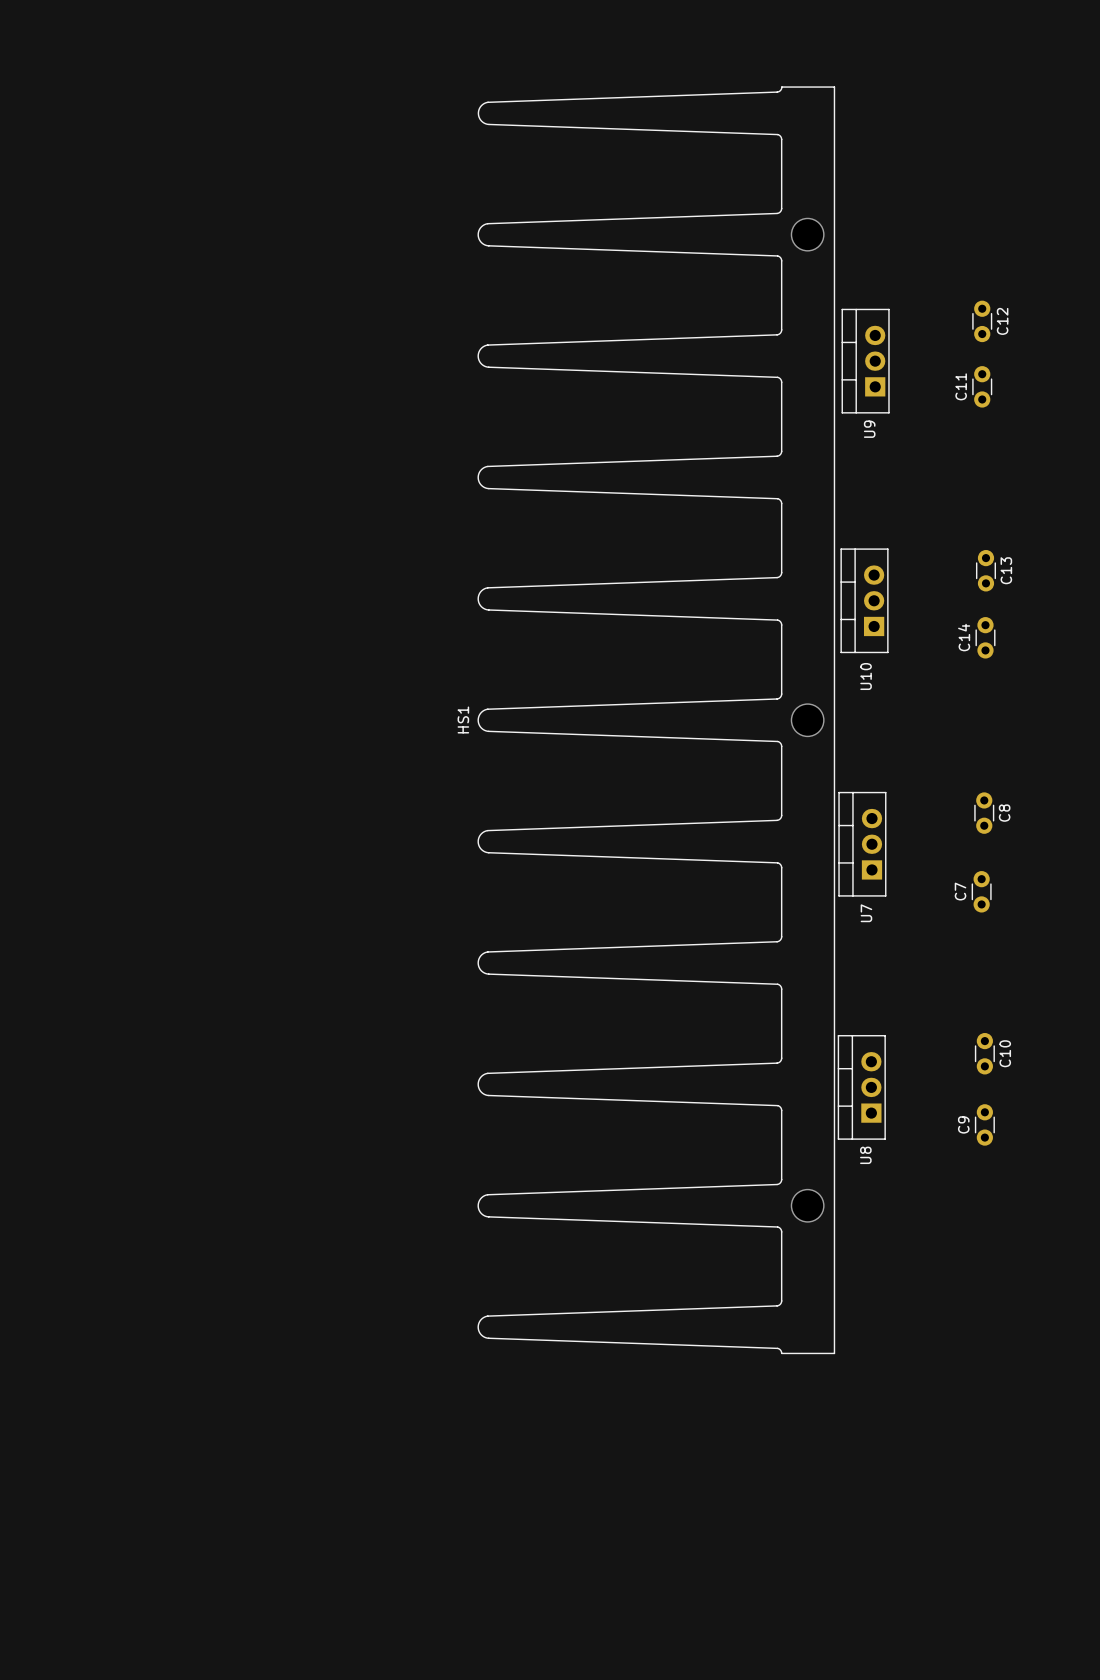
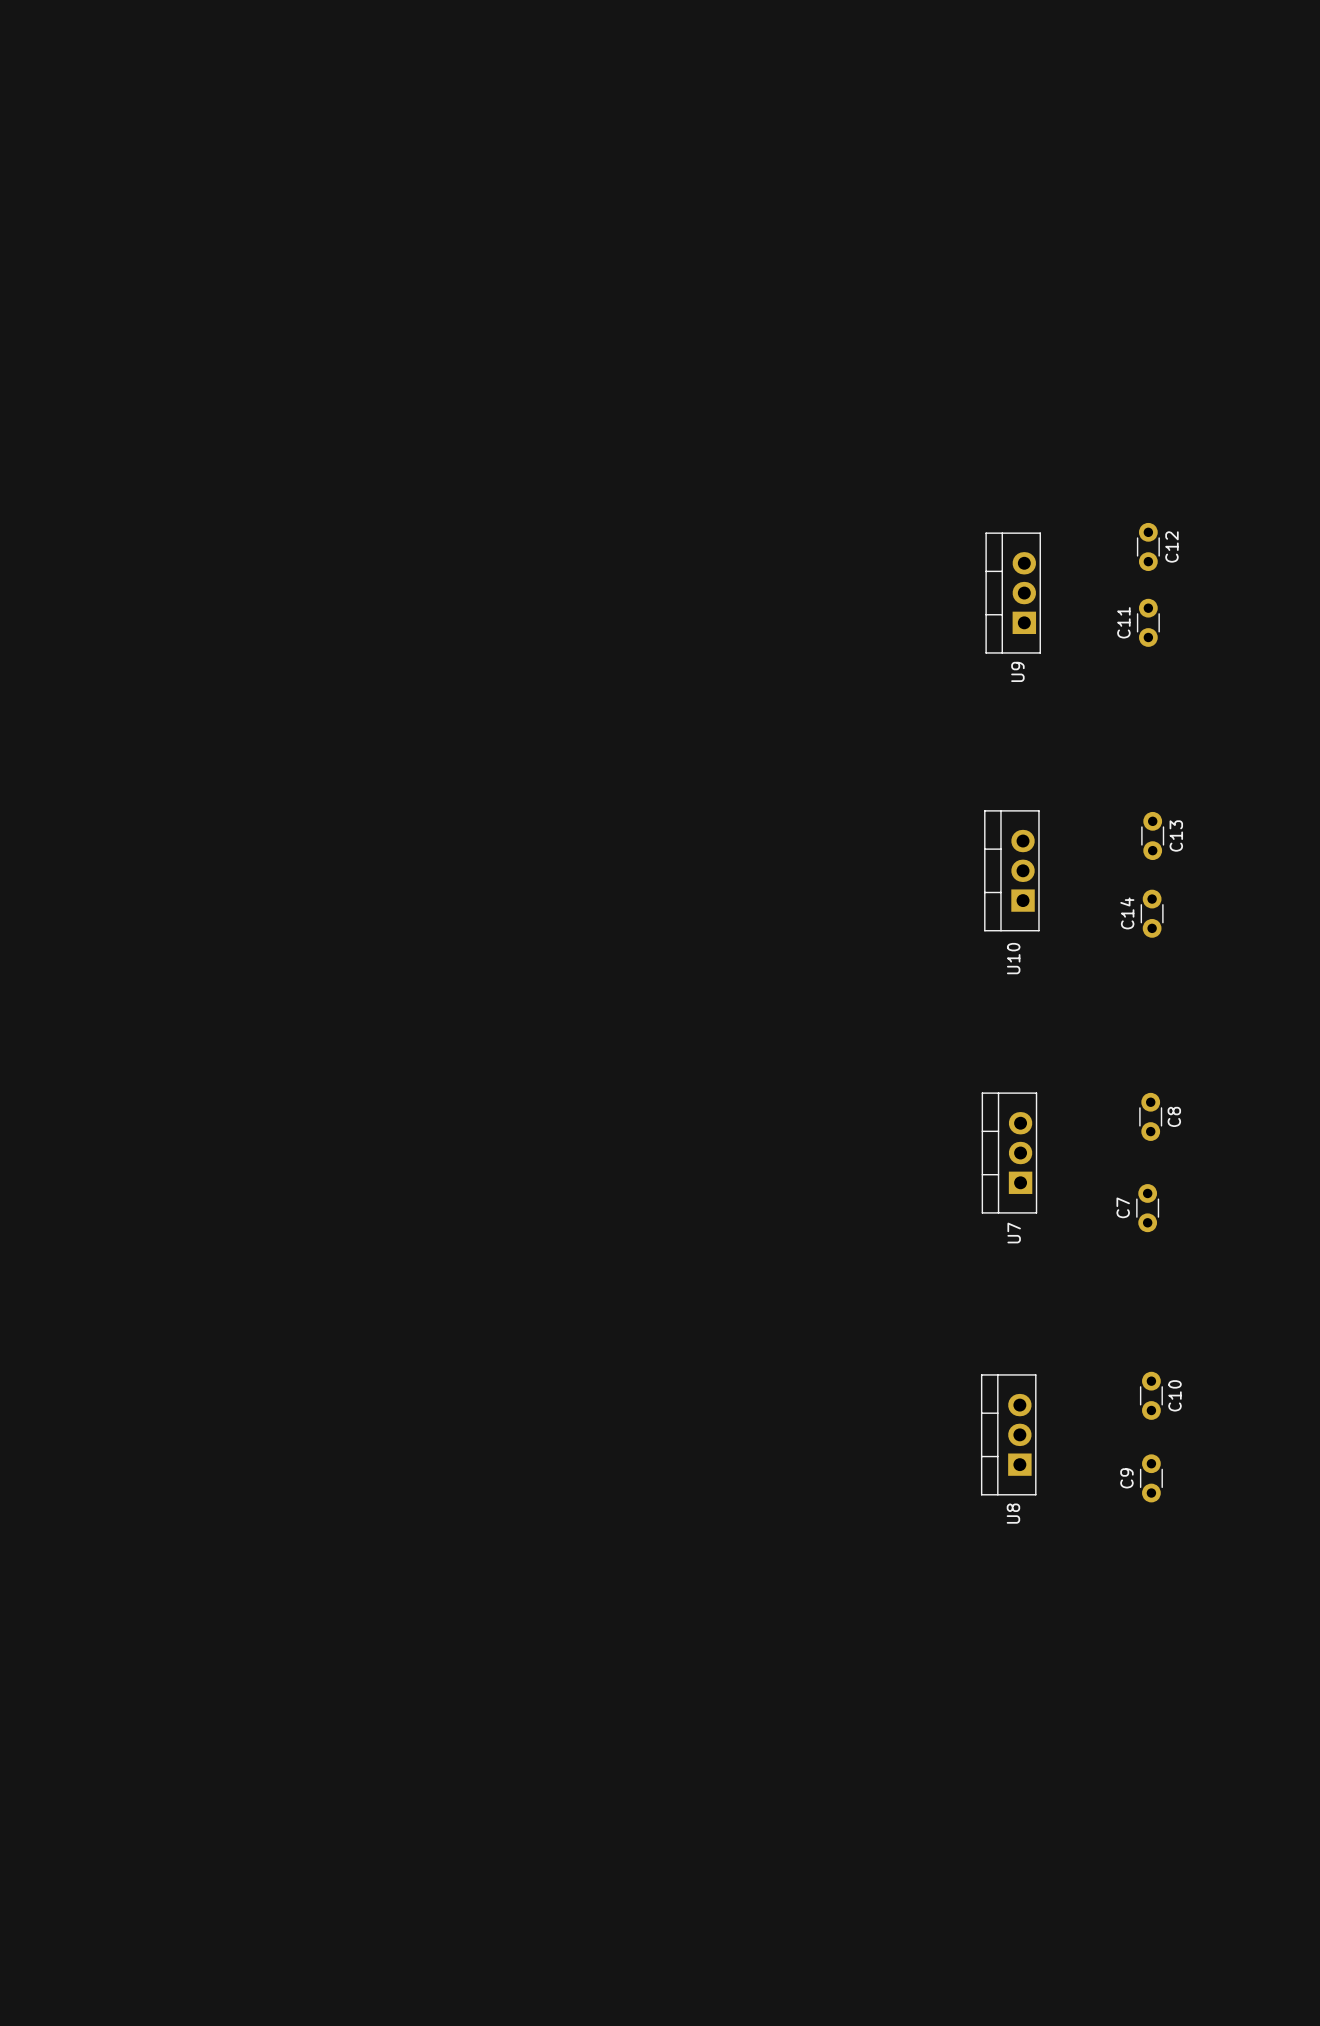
HS1: (656, 720) -> none

